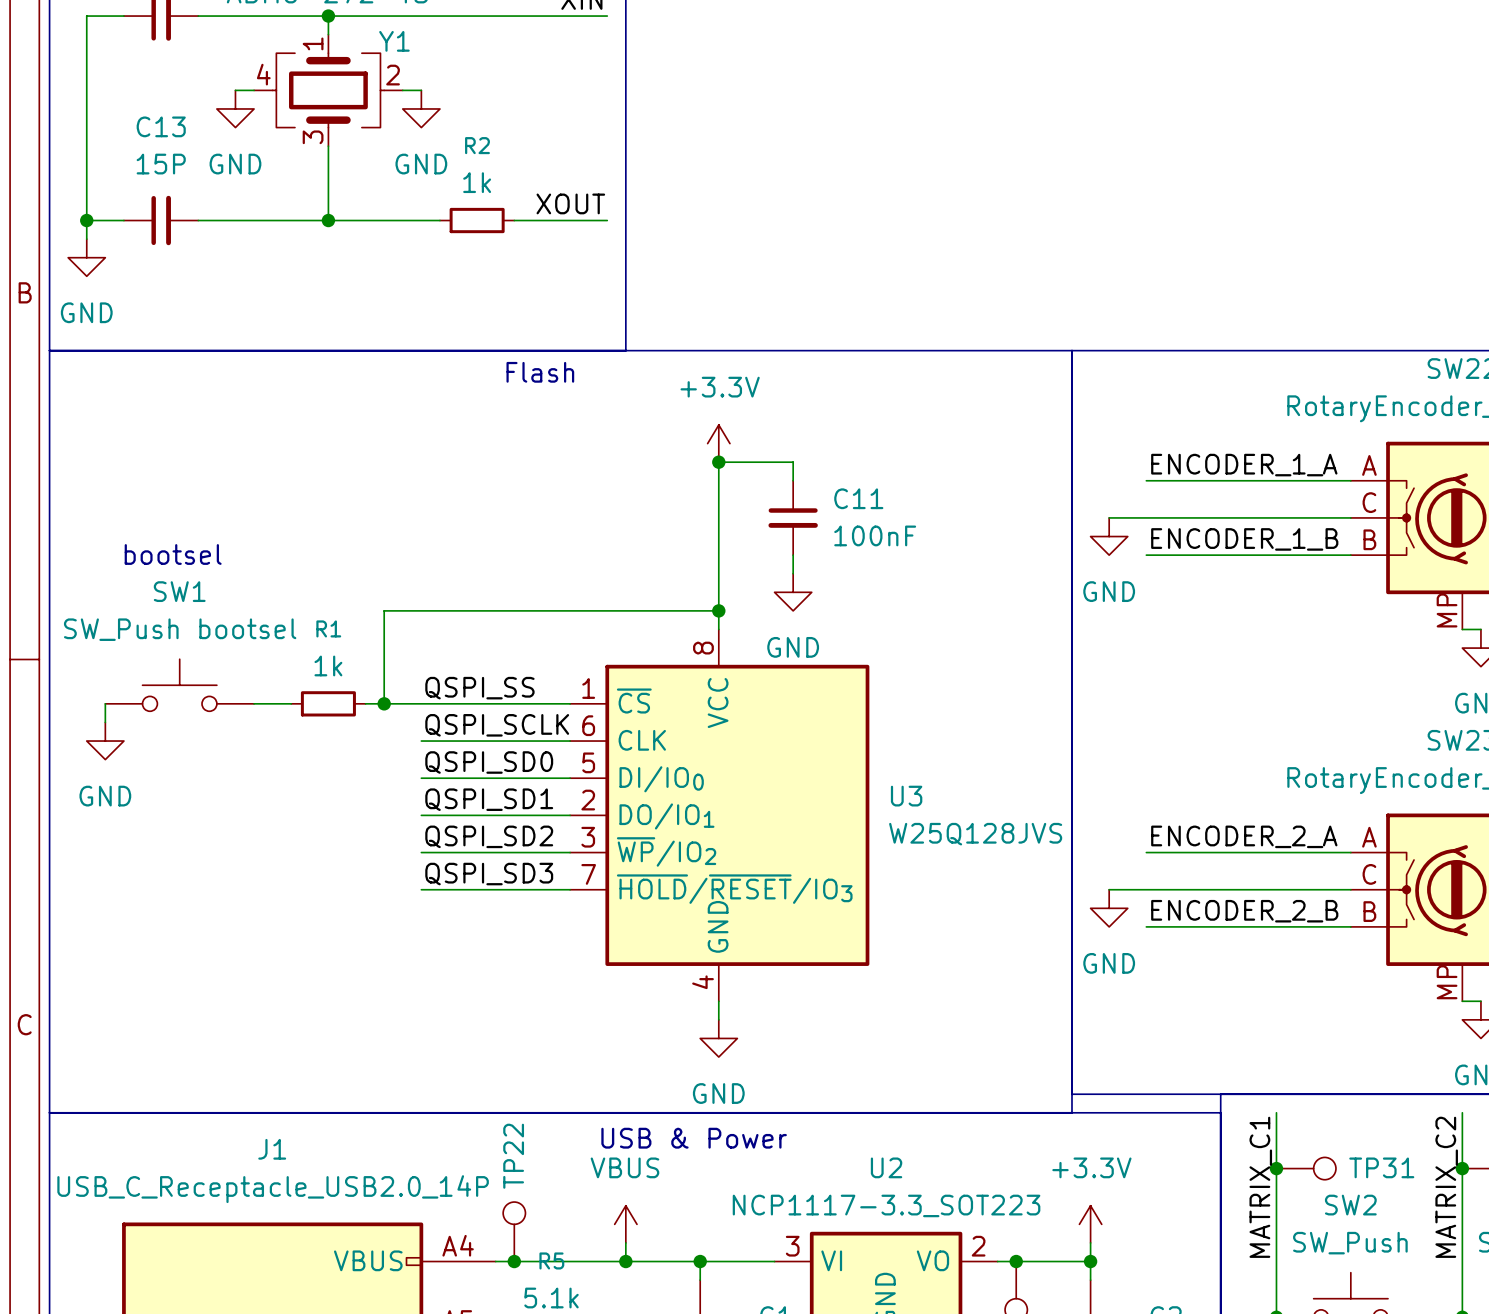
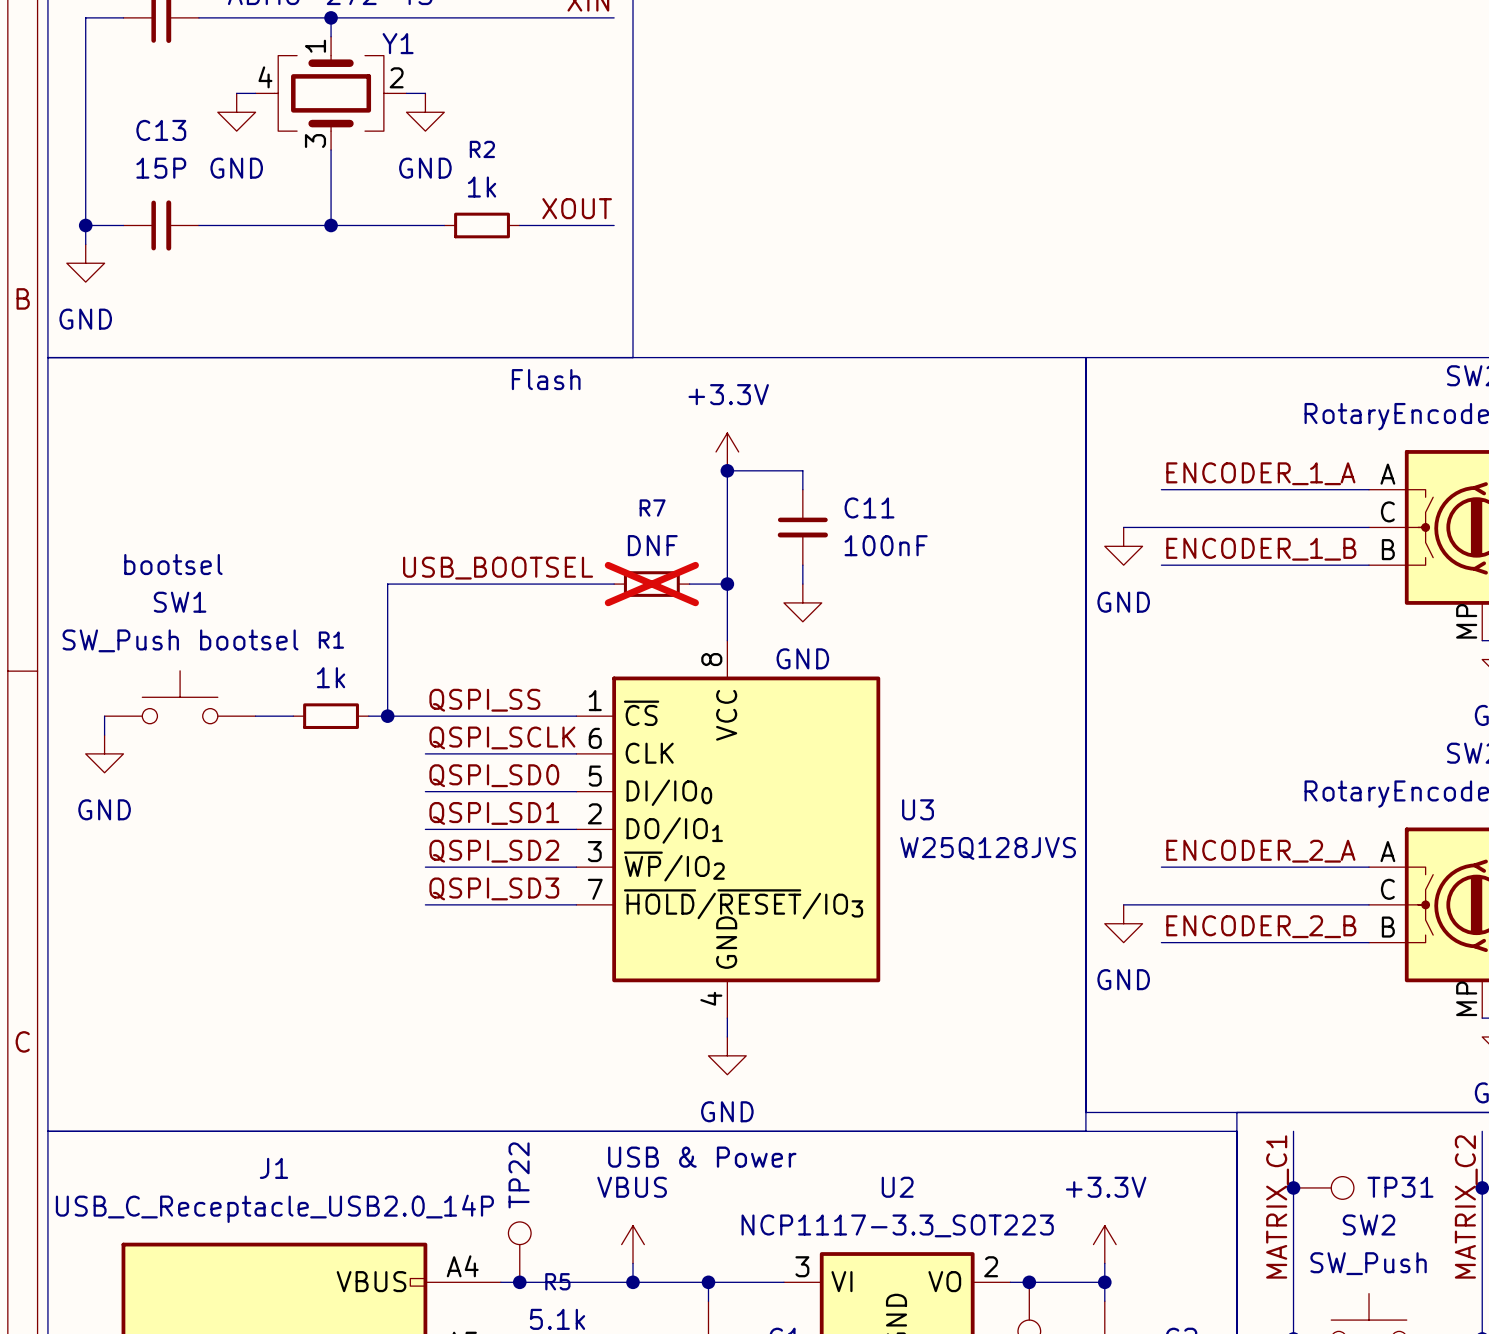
label: none -> USB_BOOTSEL (498, 568)
R7: none -> DNF (651, 584)
wire: none -> (689, 584) (727, 584)
wire: (384, 610) (718, 610) -> (387, 621) (387, 584) (614, 584)
junction position: (718, 610) -> (727, 584)

